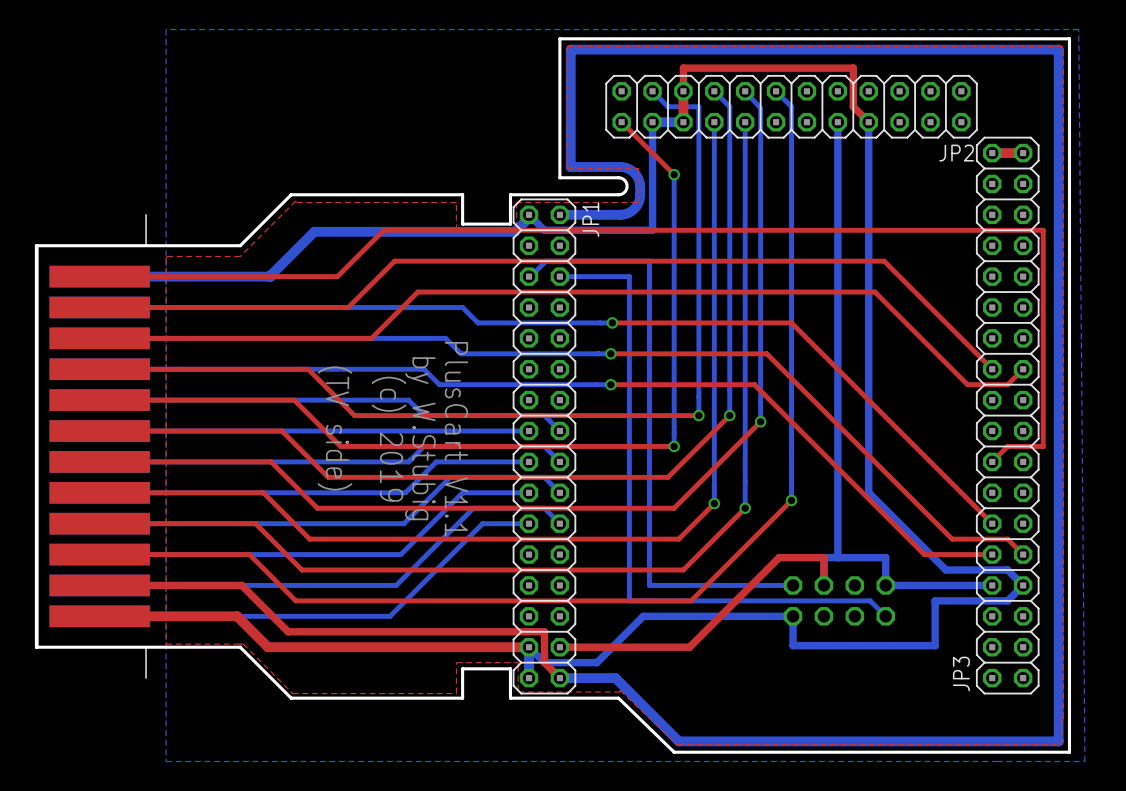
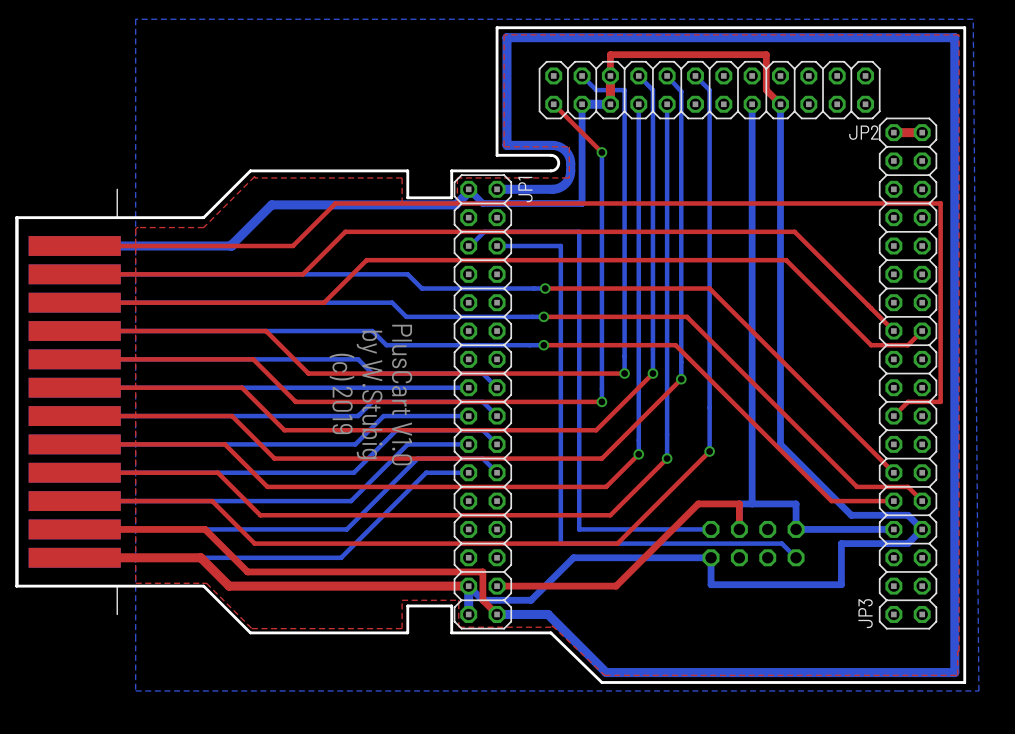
text: (TV side) (334, 428) -> none
text: PlusCart V1.1 (456, 439) -> PlusCart V1.0 (402, 395)

